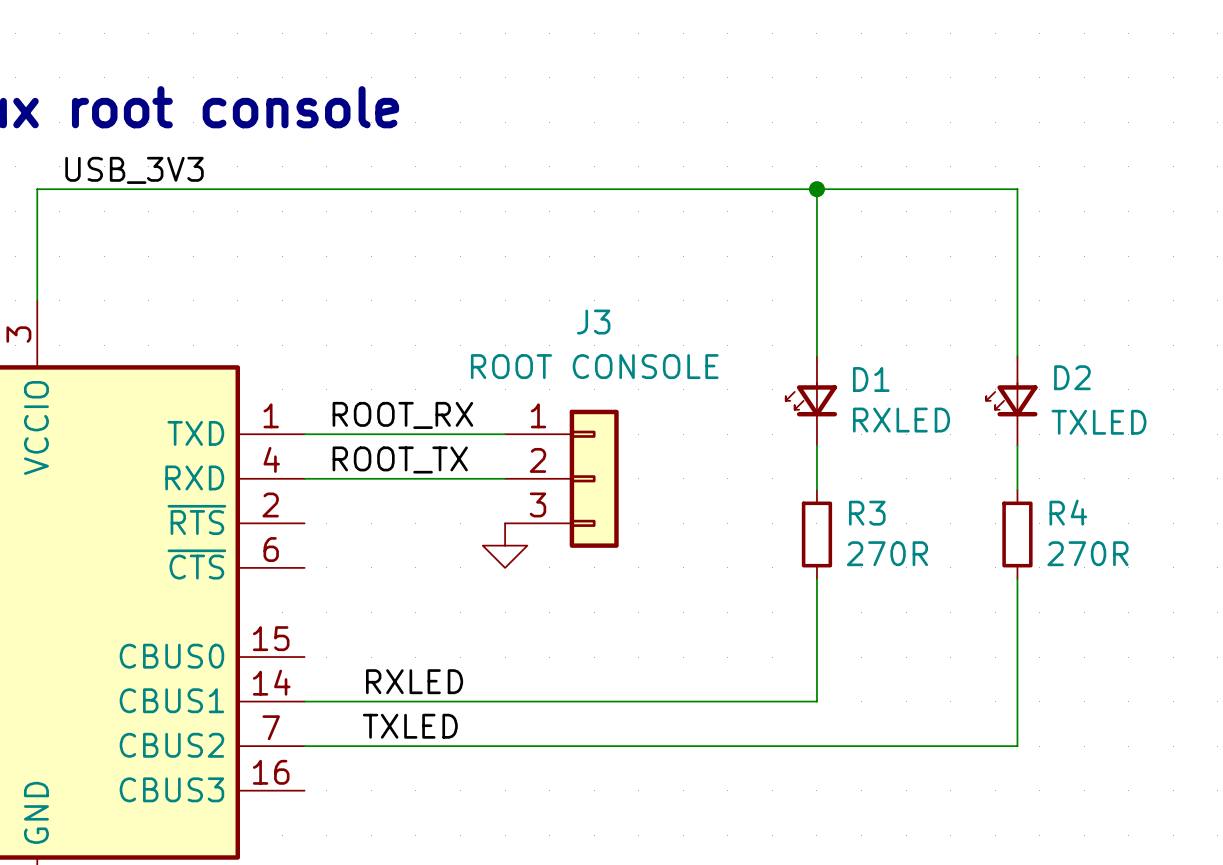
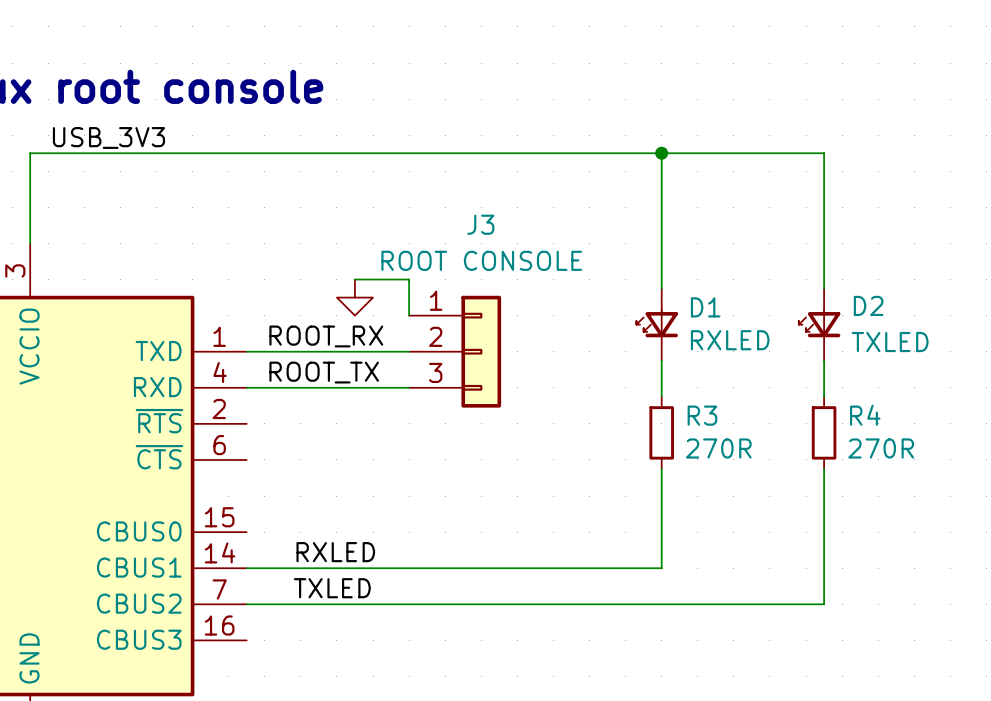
wire: none -> (354, 279) (409, 279) (409, 315)
J3 position: (561, 478) -> (455, 351)
power symbol position: (505, 545) -> (354, 297)

